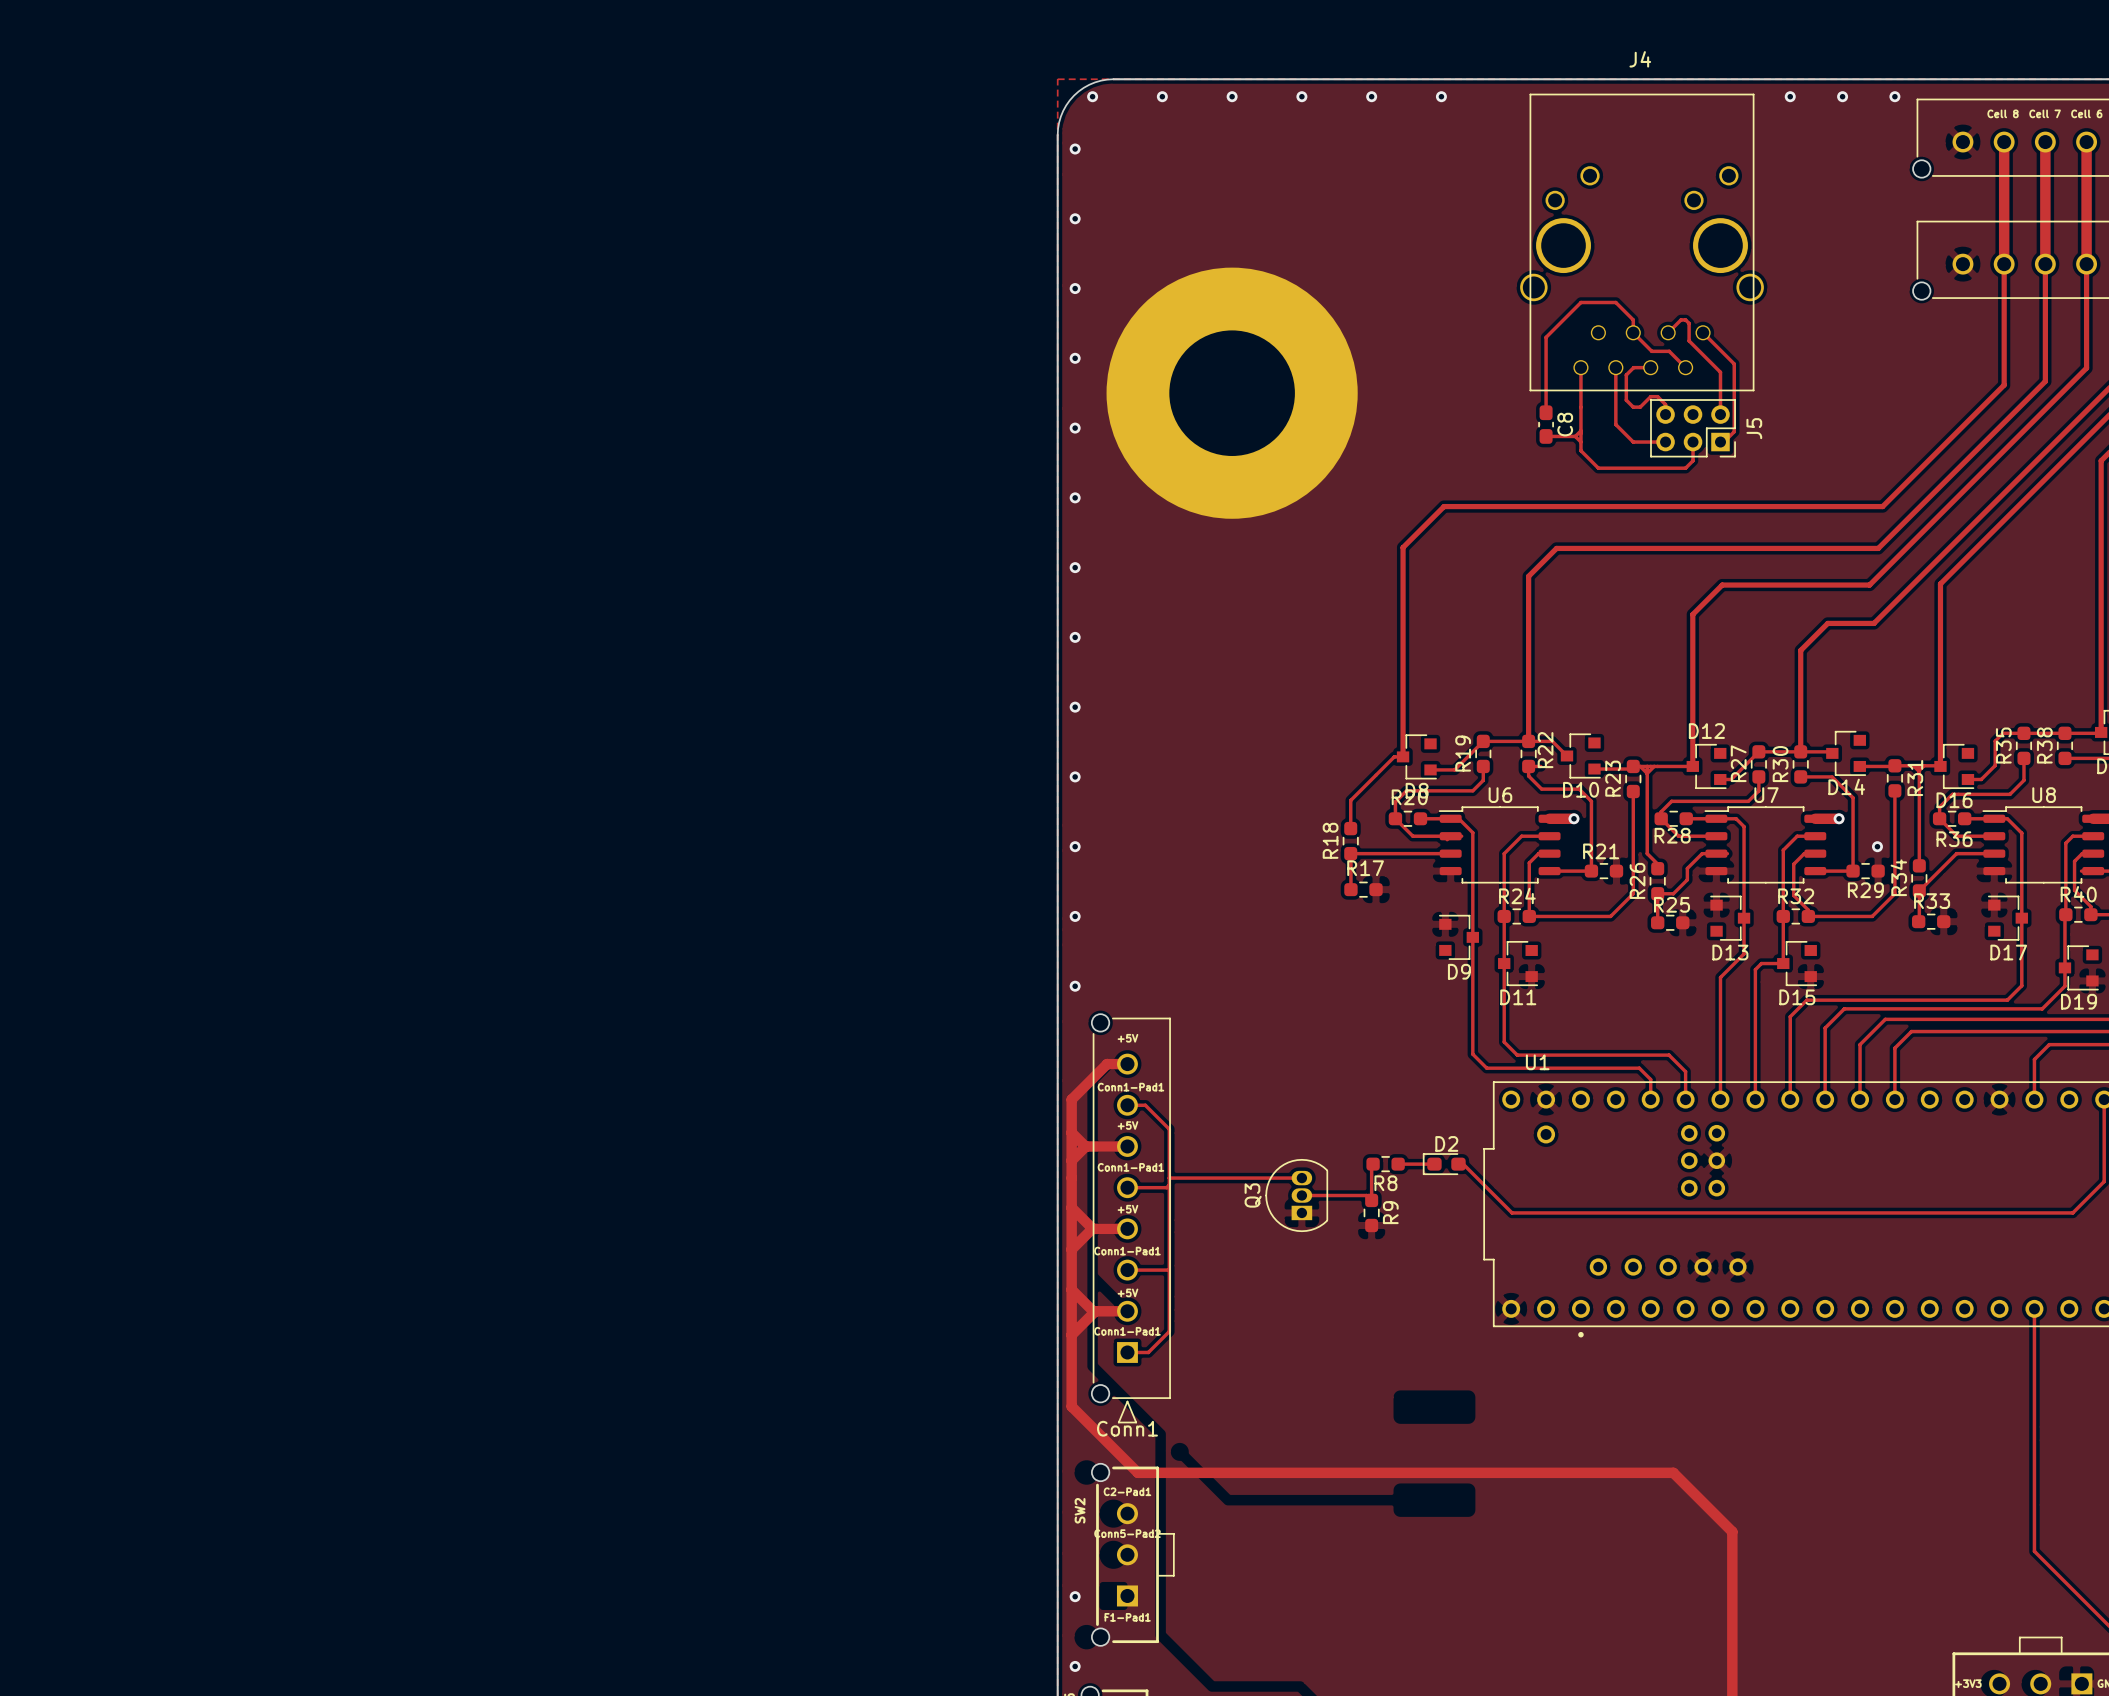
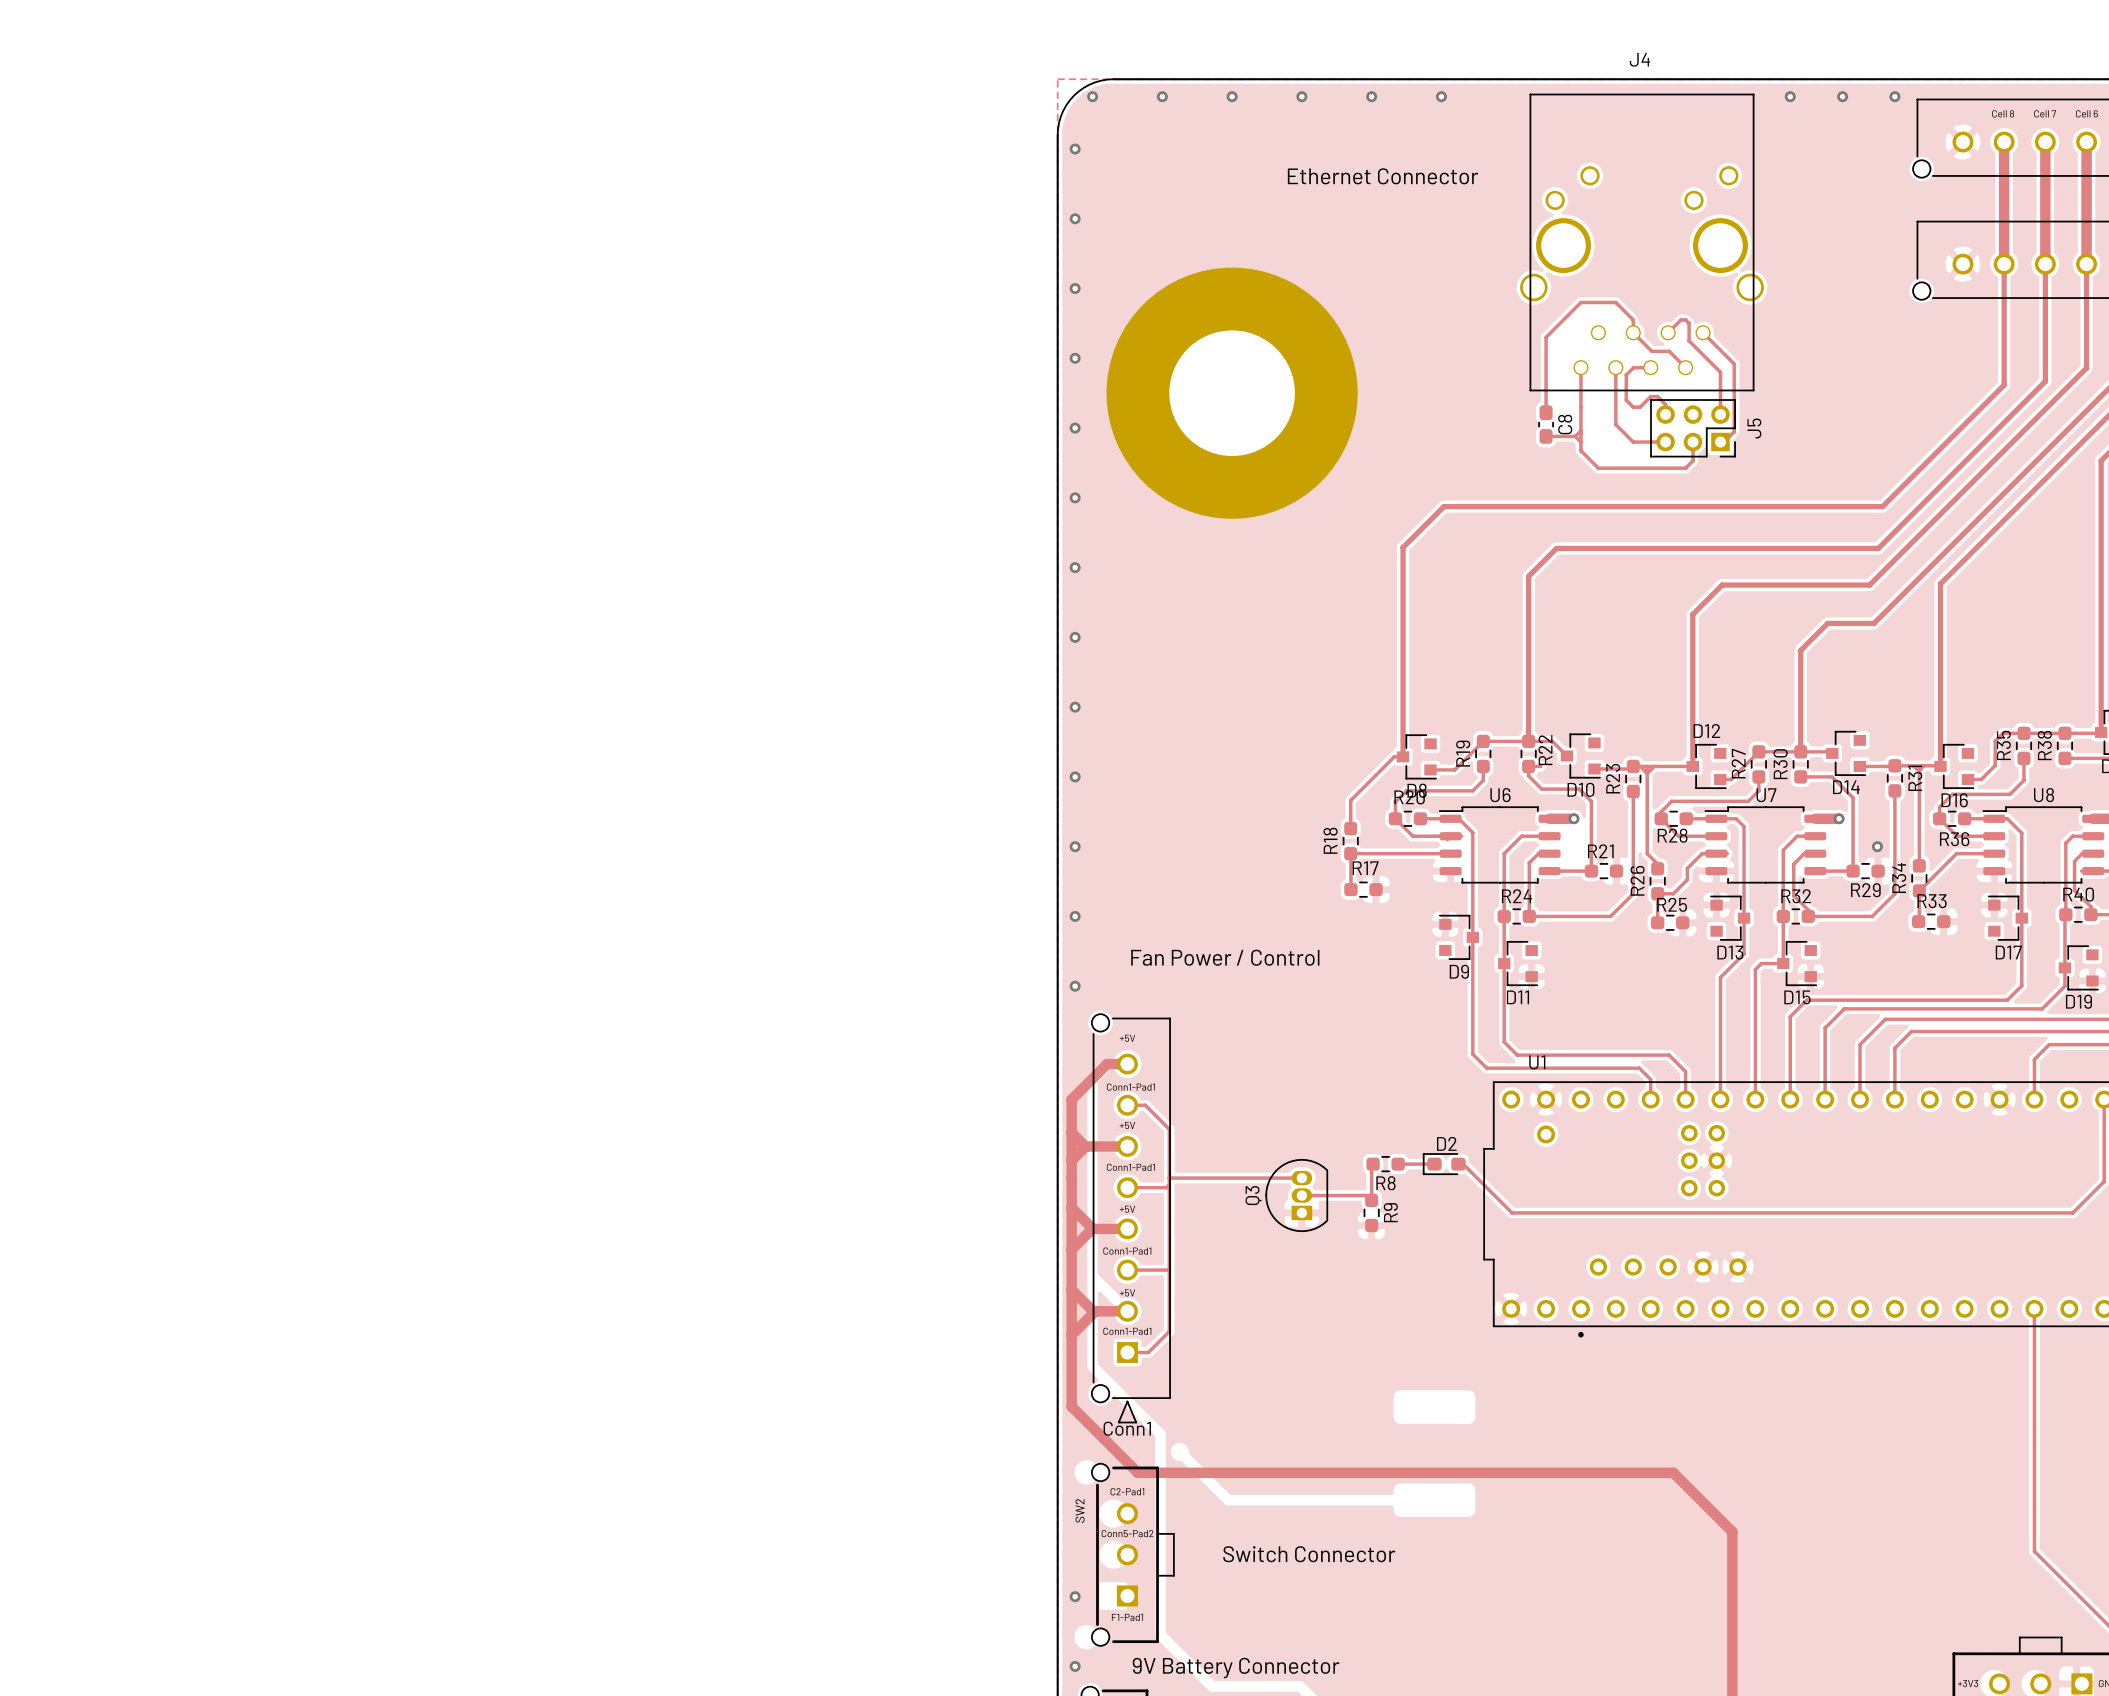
text: none -> Ethernet Connector (1383, 176)
text: none -> Fan Power / Control (1225, 957)
text: none -> Switch Connector (1309, 1554)
text: none -> 9V Battery Connector (1236, 1668)

